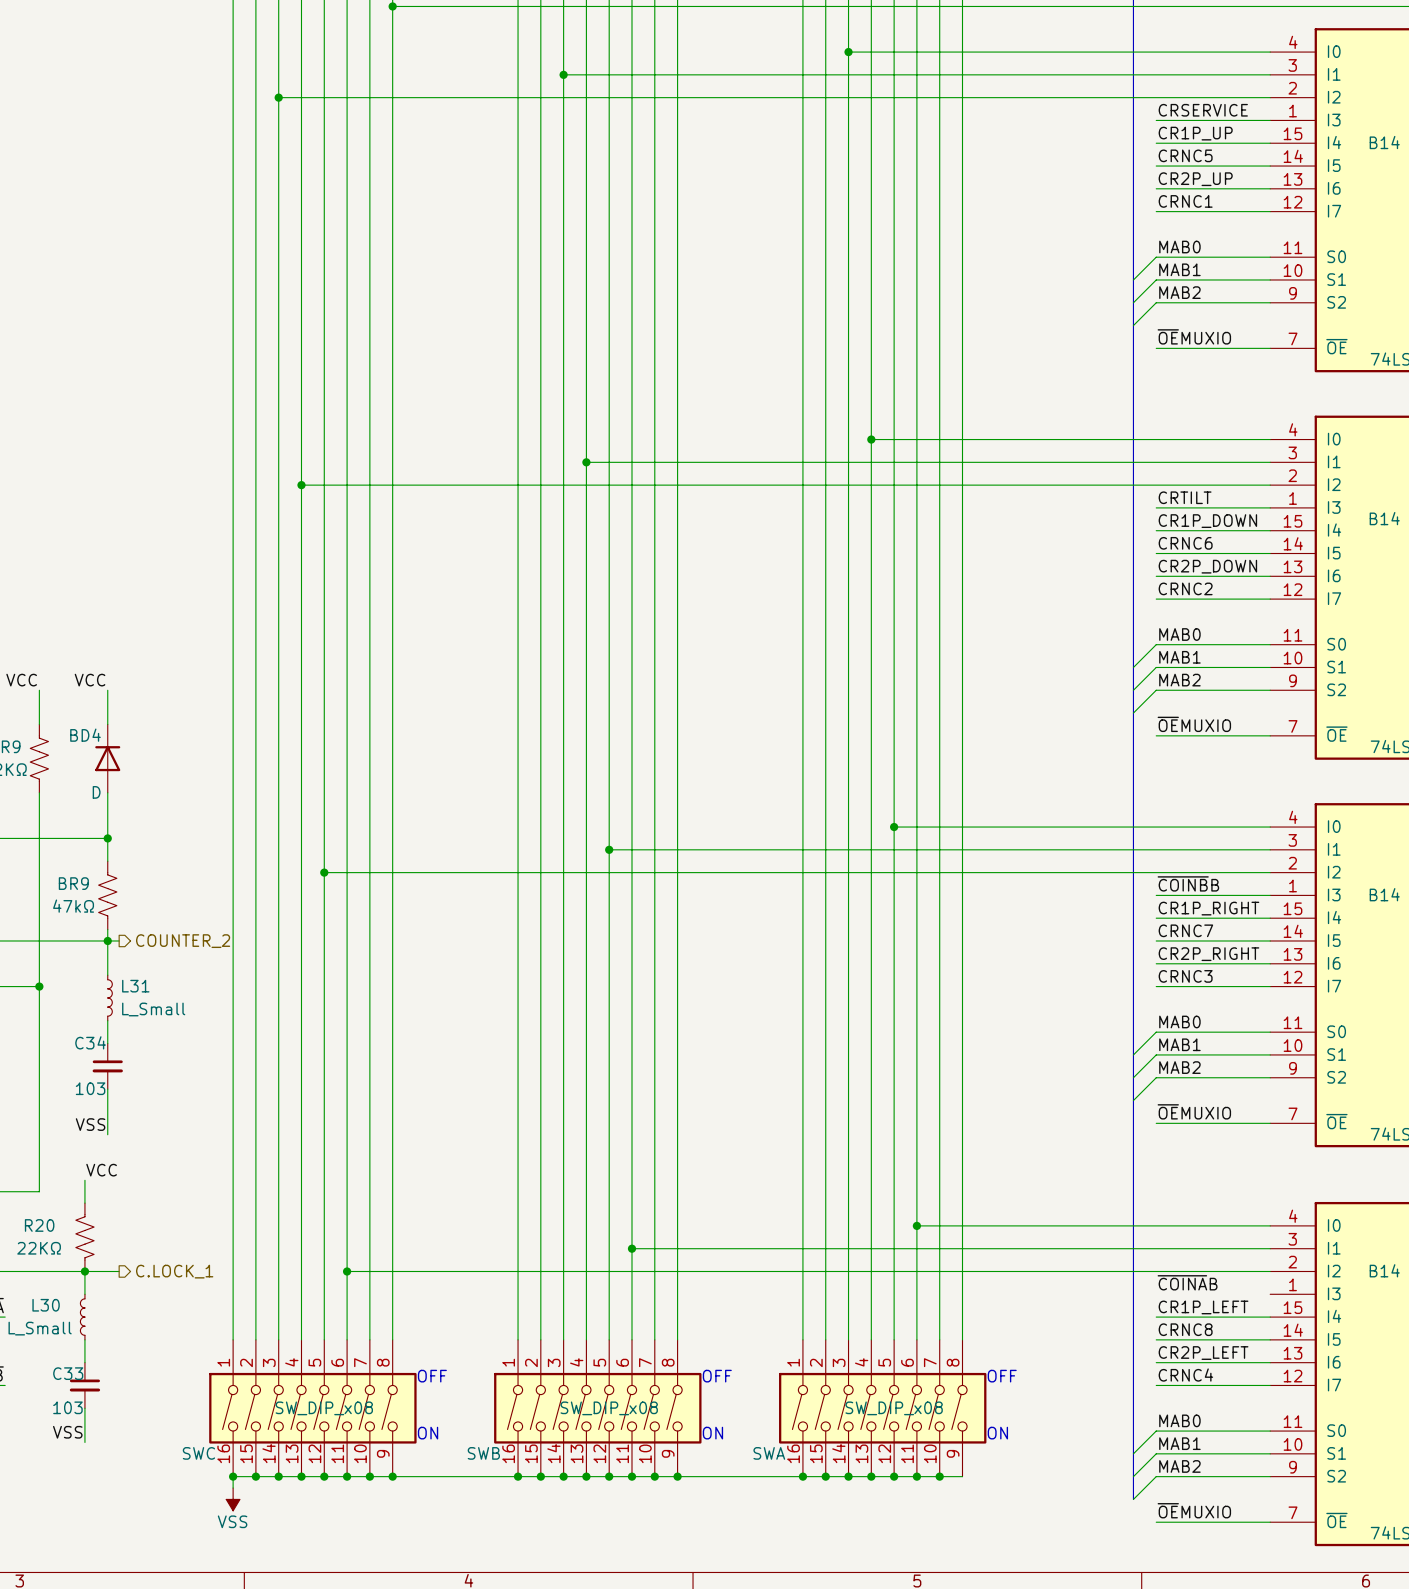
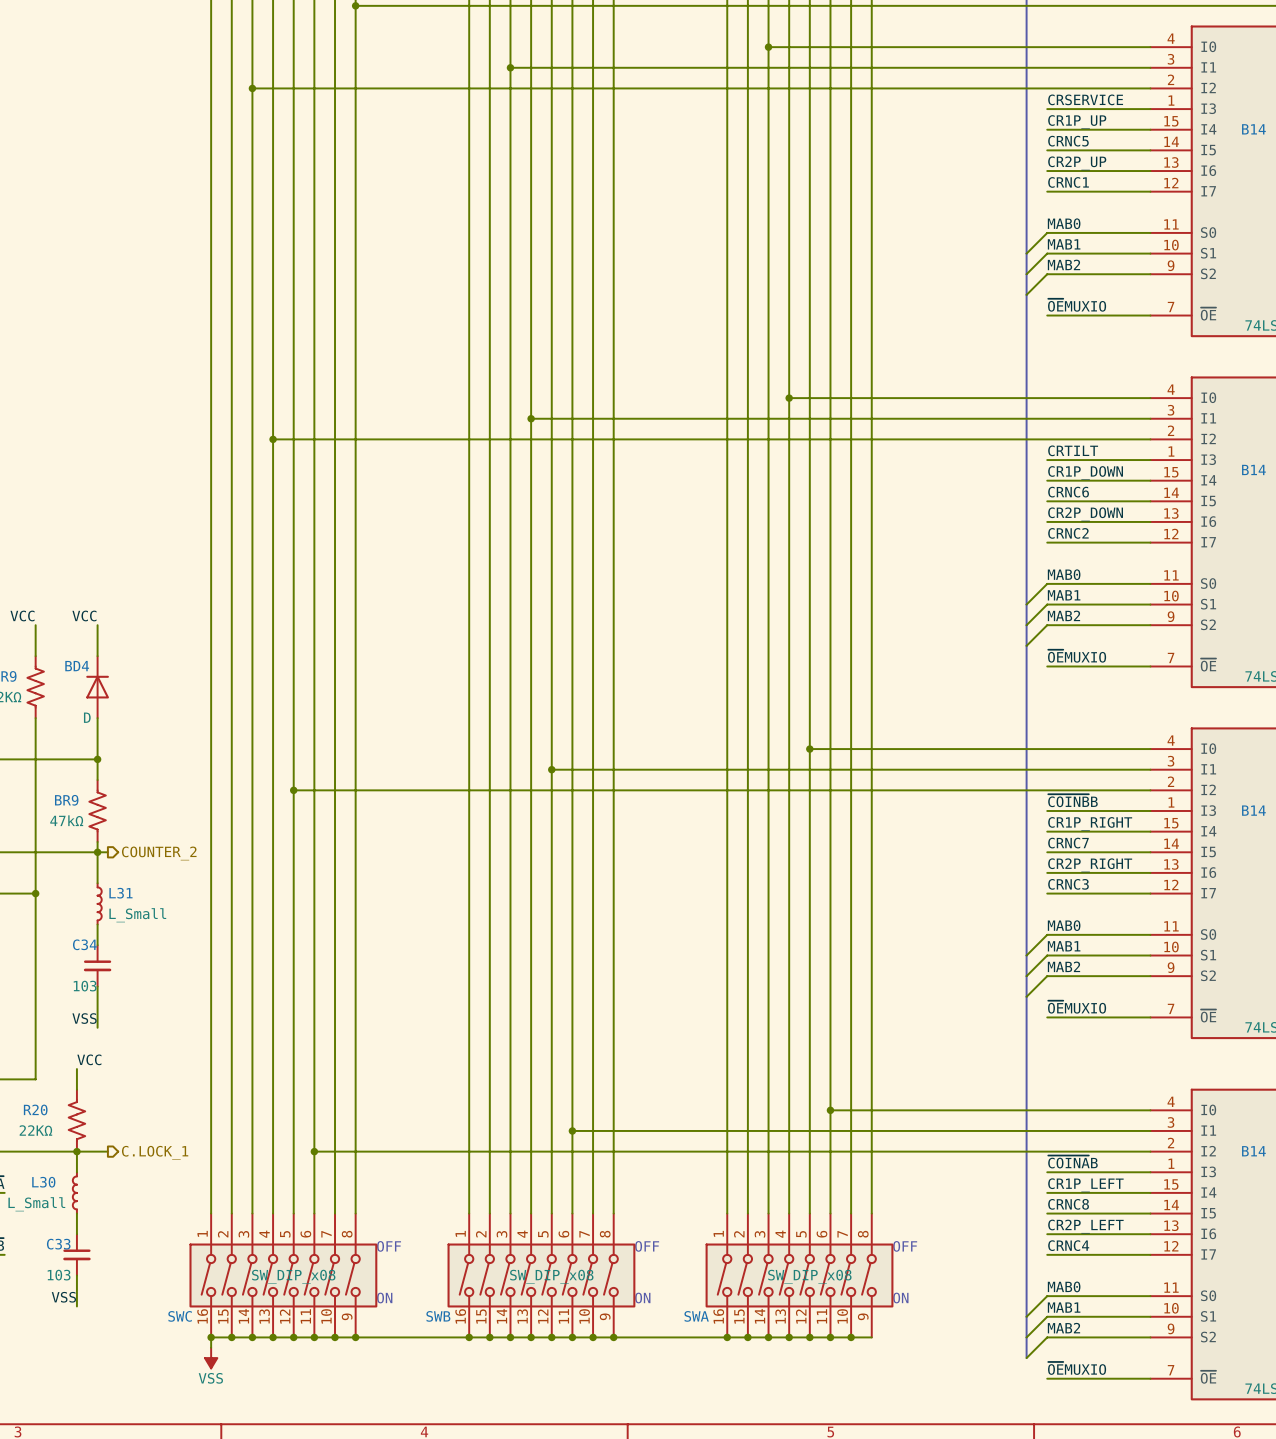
wire: none -> (1047, 1172) (1150, 1172)

